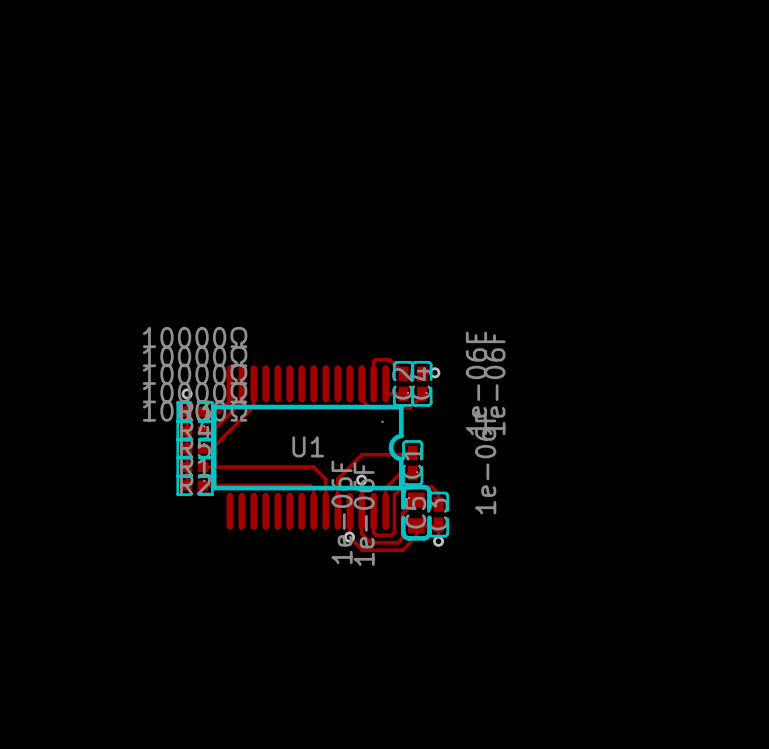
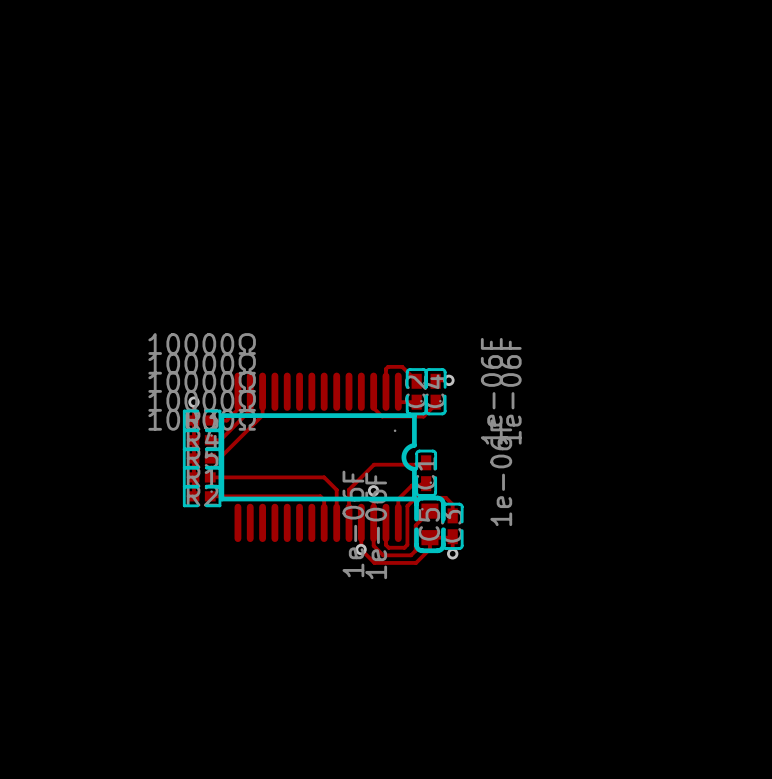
U1 name: U1 (308, 446) -> none

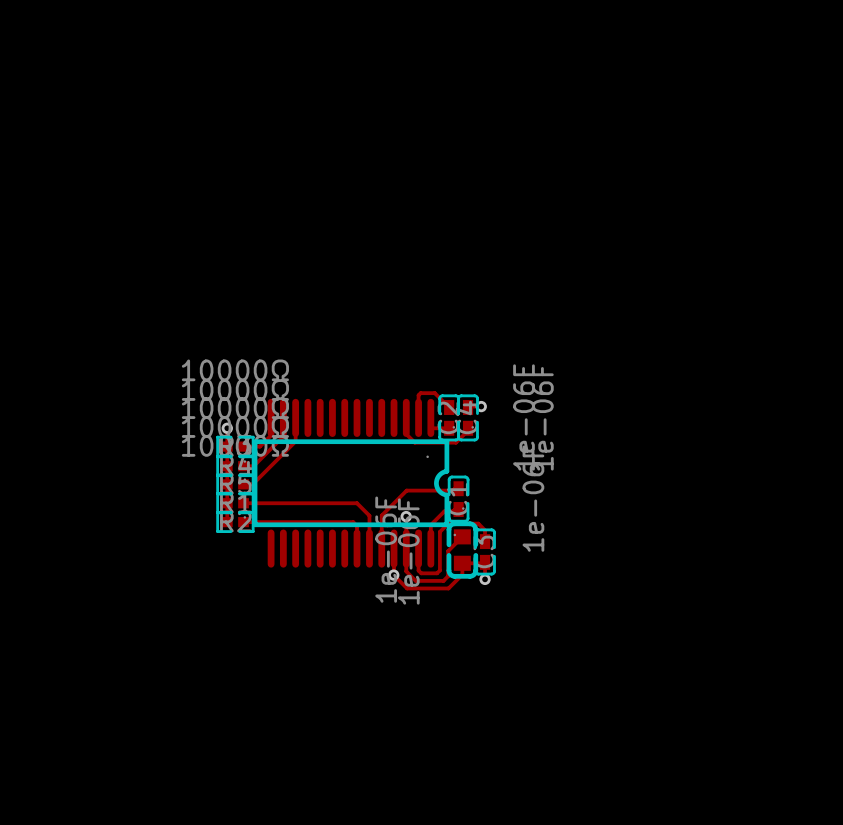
C5 name: C5 (429, 524) -> none

